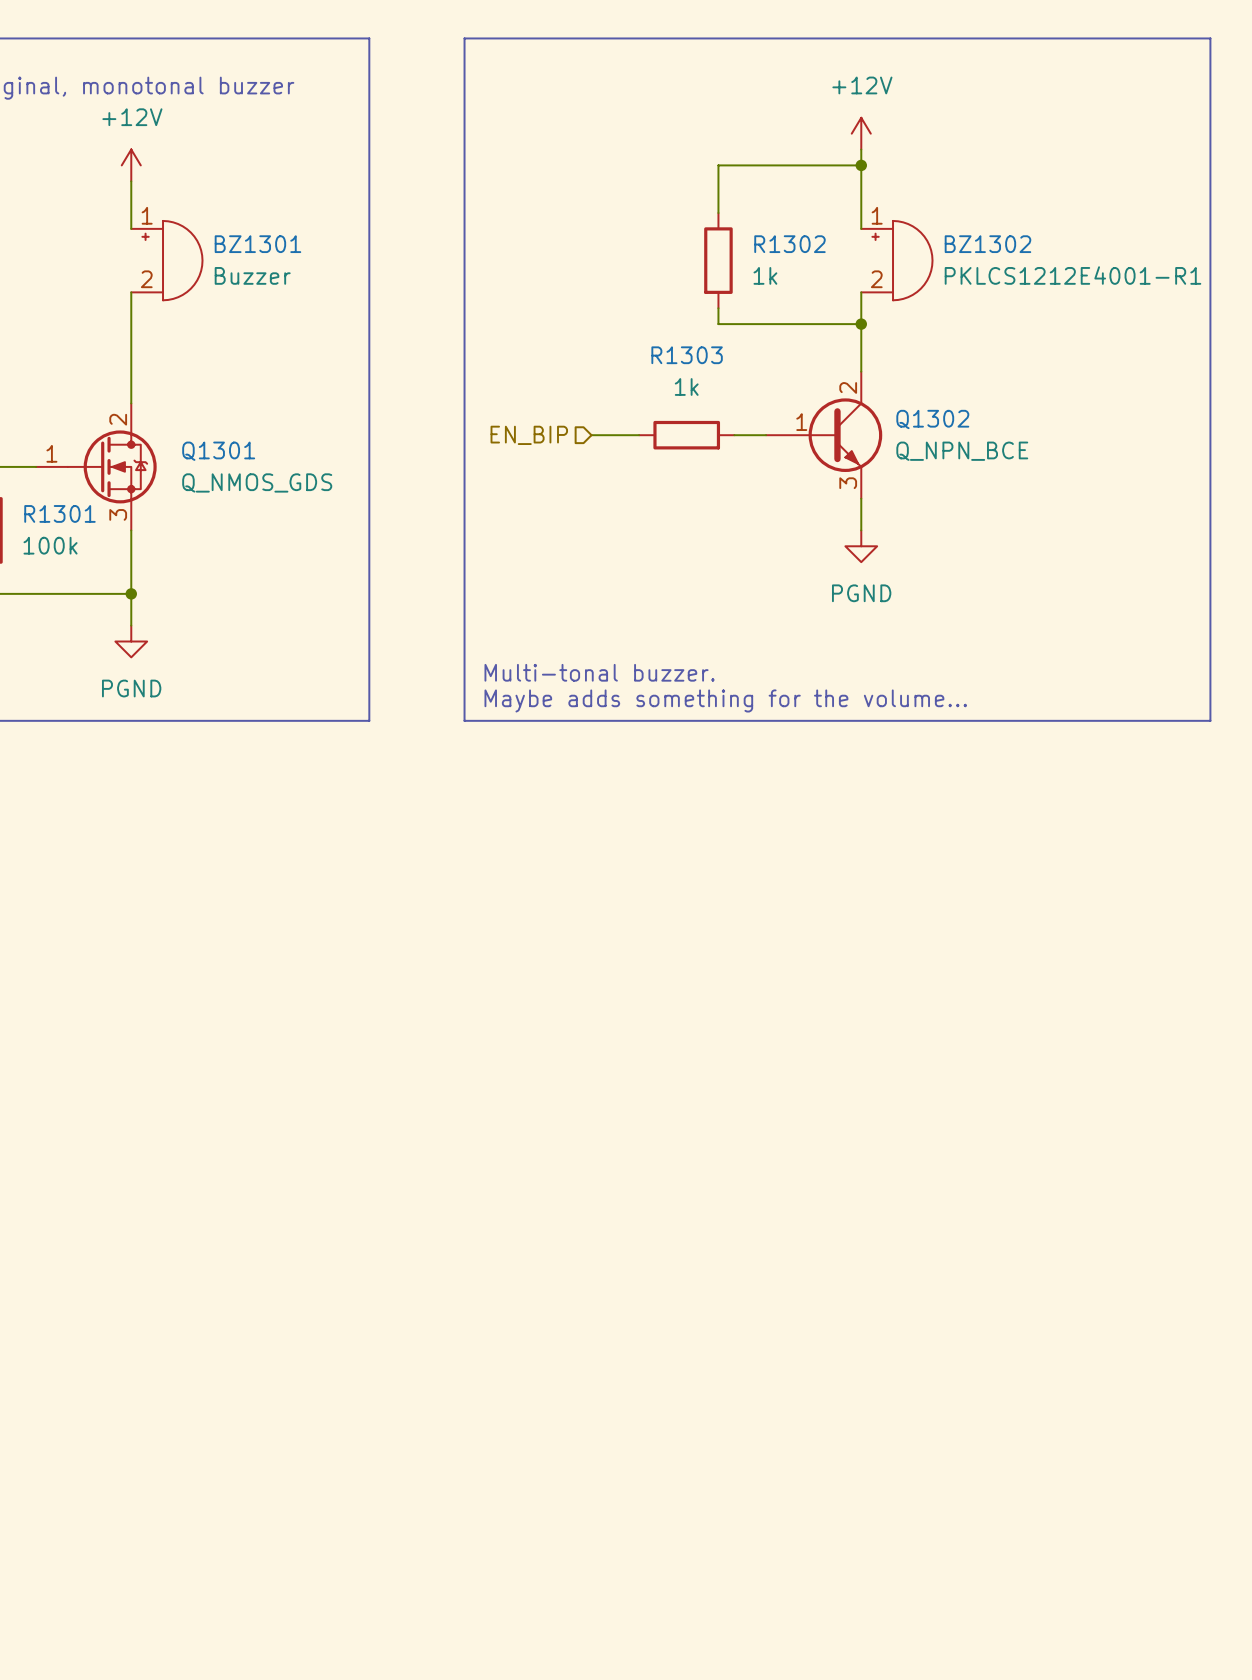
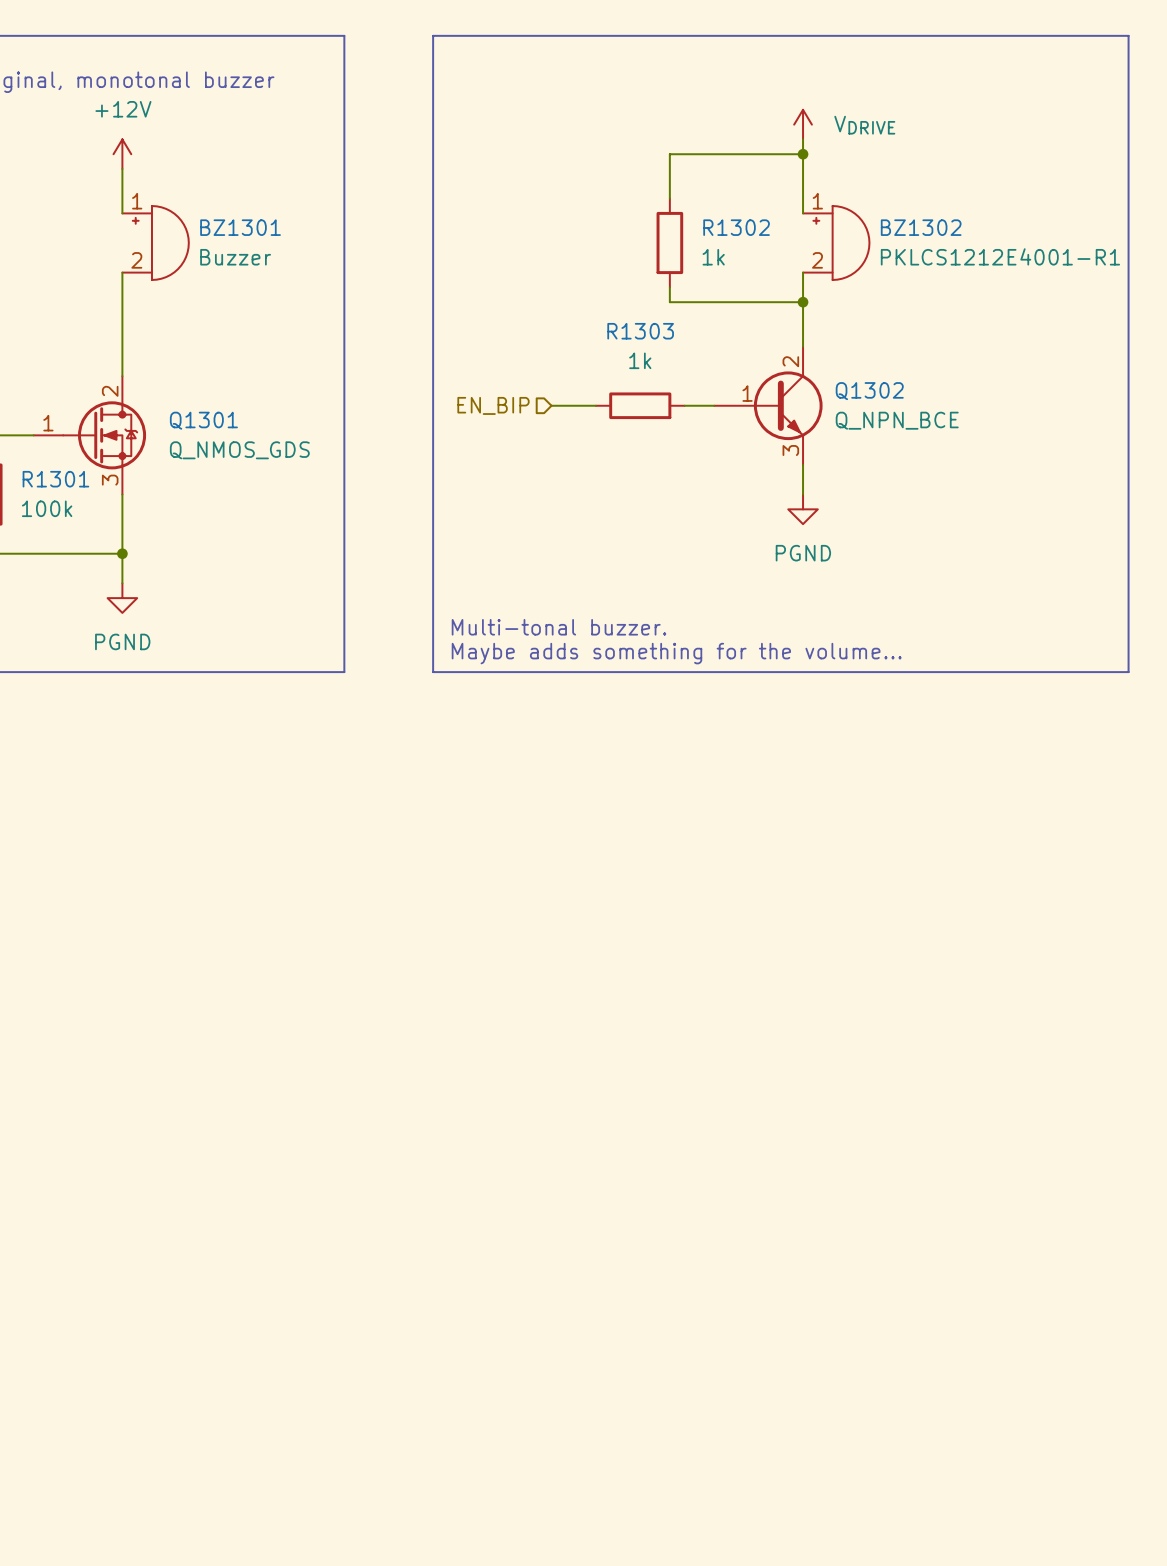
power symbol: +12V (861, 133) -> VDRIVE (803, 124)

